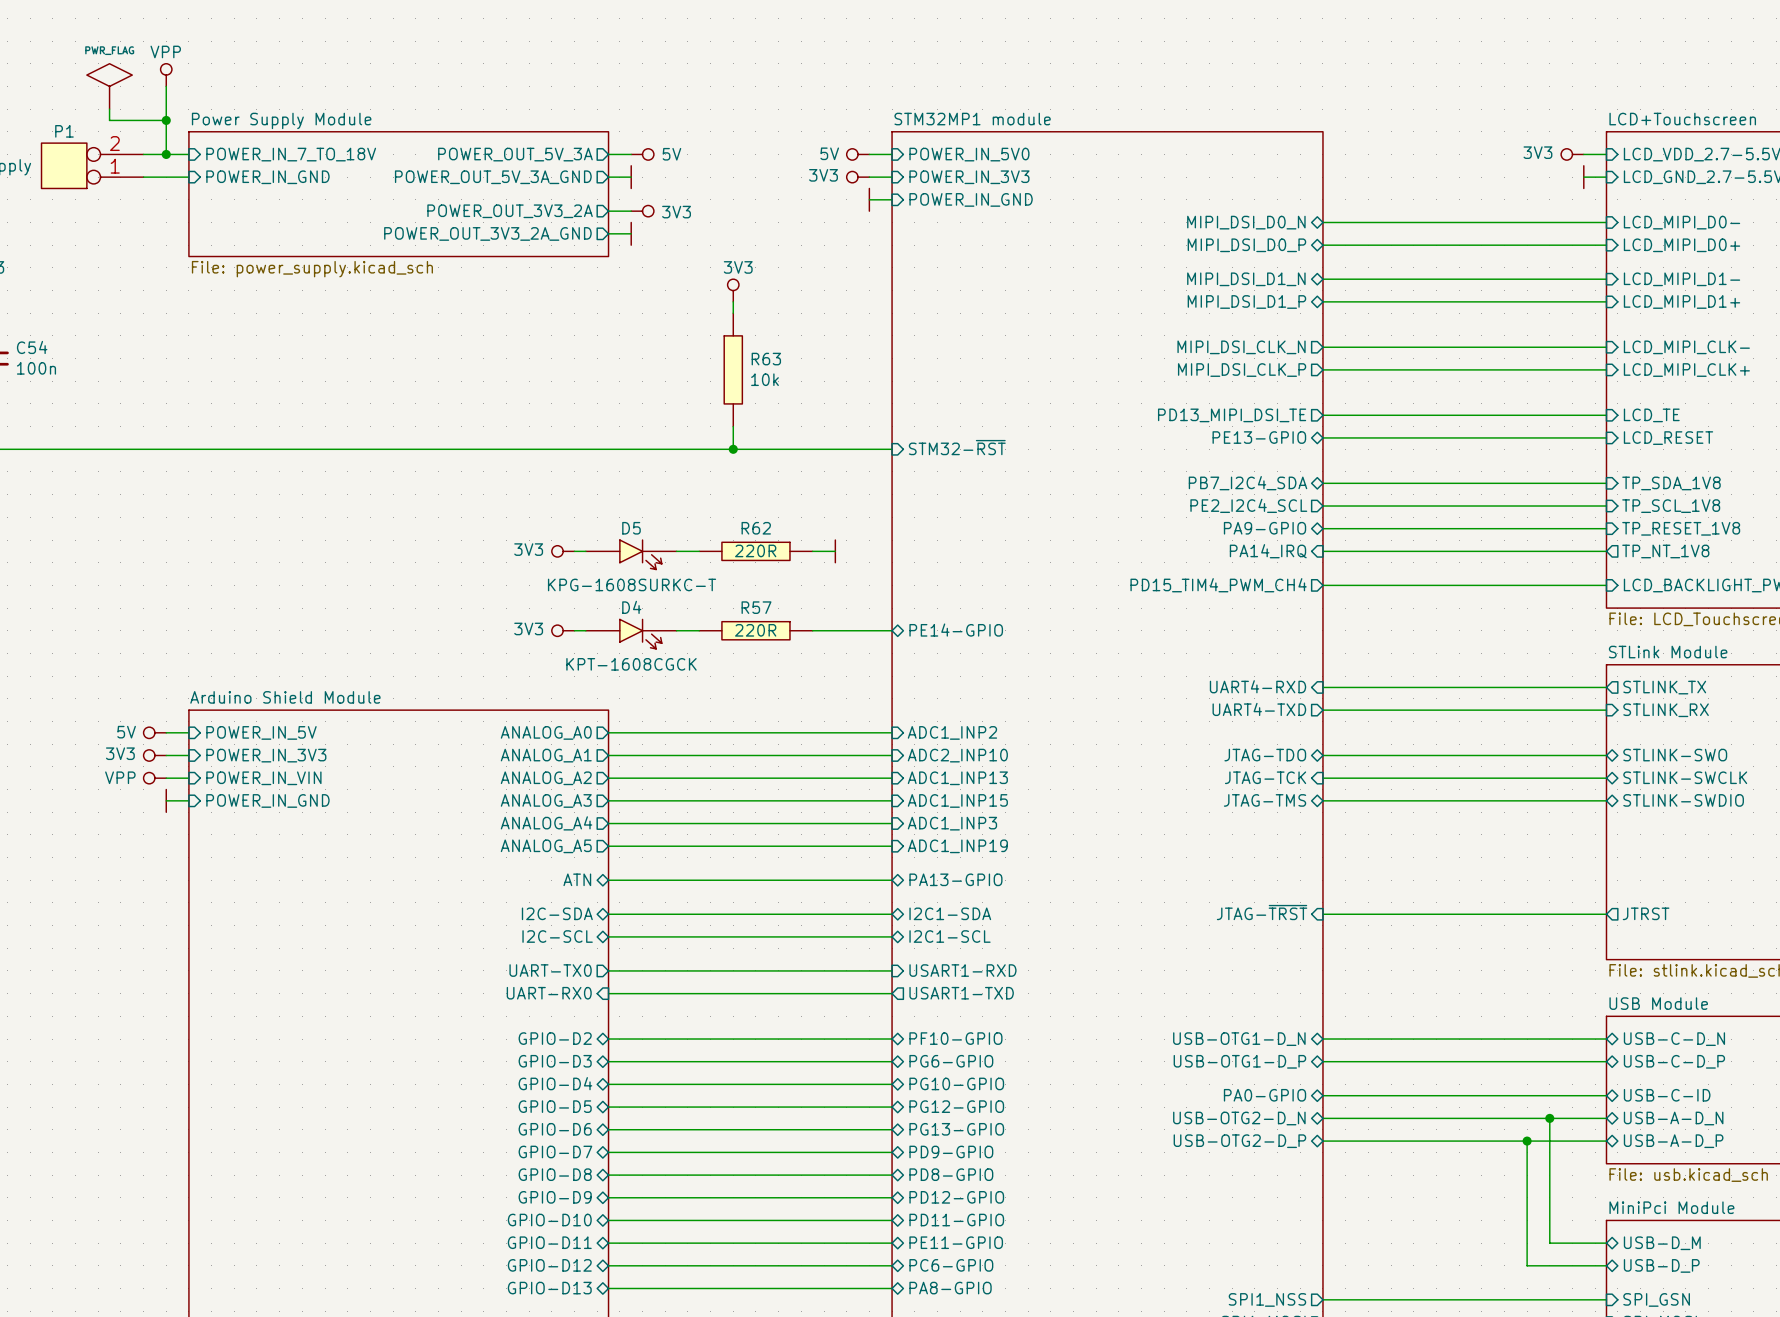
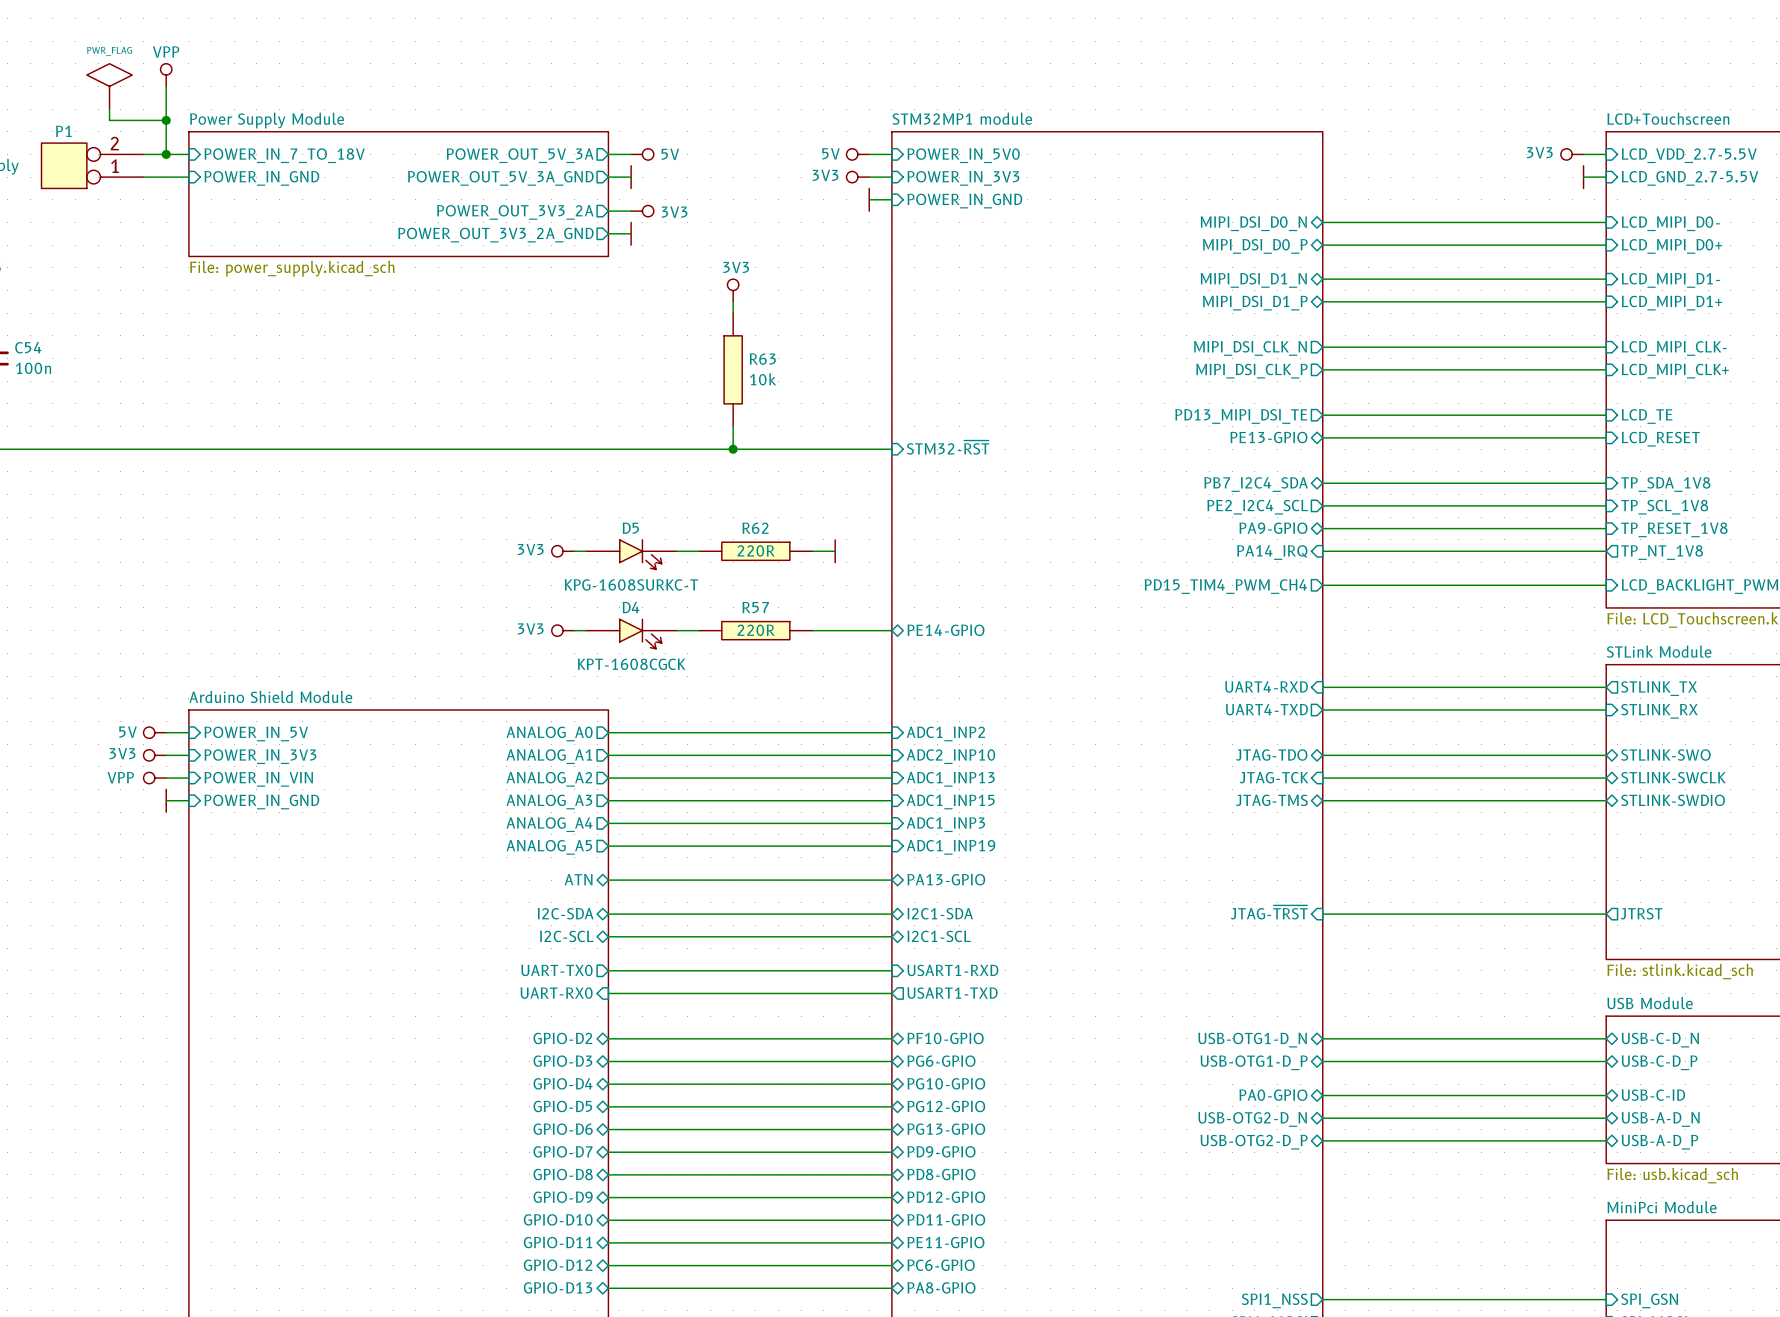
wire: (1549, 1118) (1549, 1243) (1606, 1243) -> none
junction: (1549, 1118) -> none
wire: (1527, 1141) (1527, 1265) (1606, 1265) -> none
junction: (1527, 1141) -> none
sheet pin: USB-D_M (1662, 1243) -> none
sheet pin: USB-D_P (1661, 1265) -> none

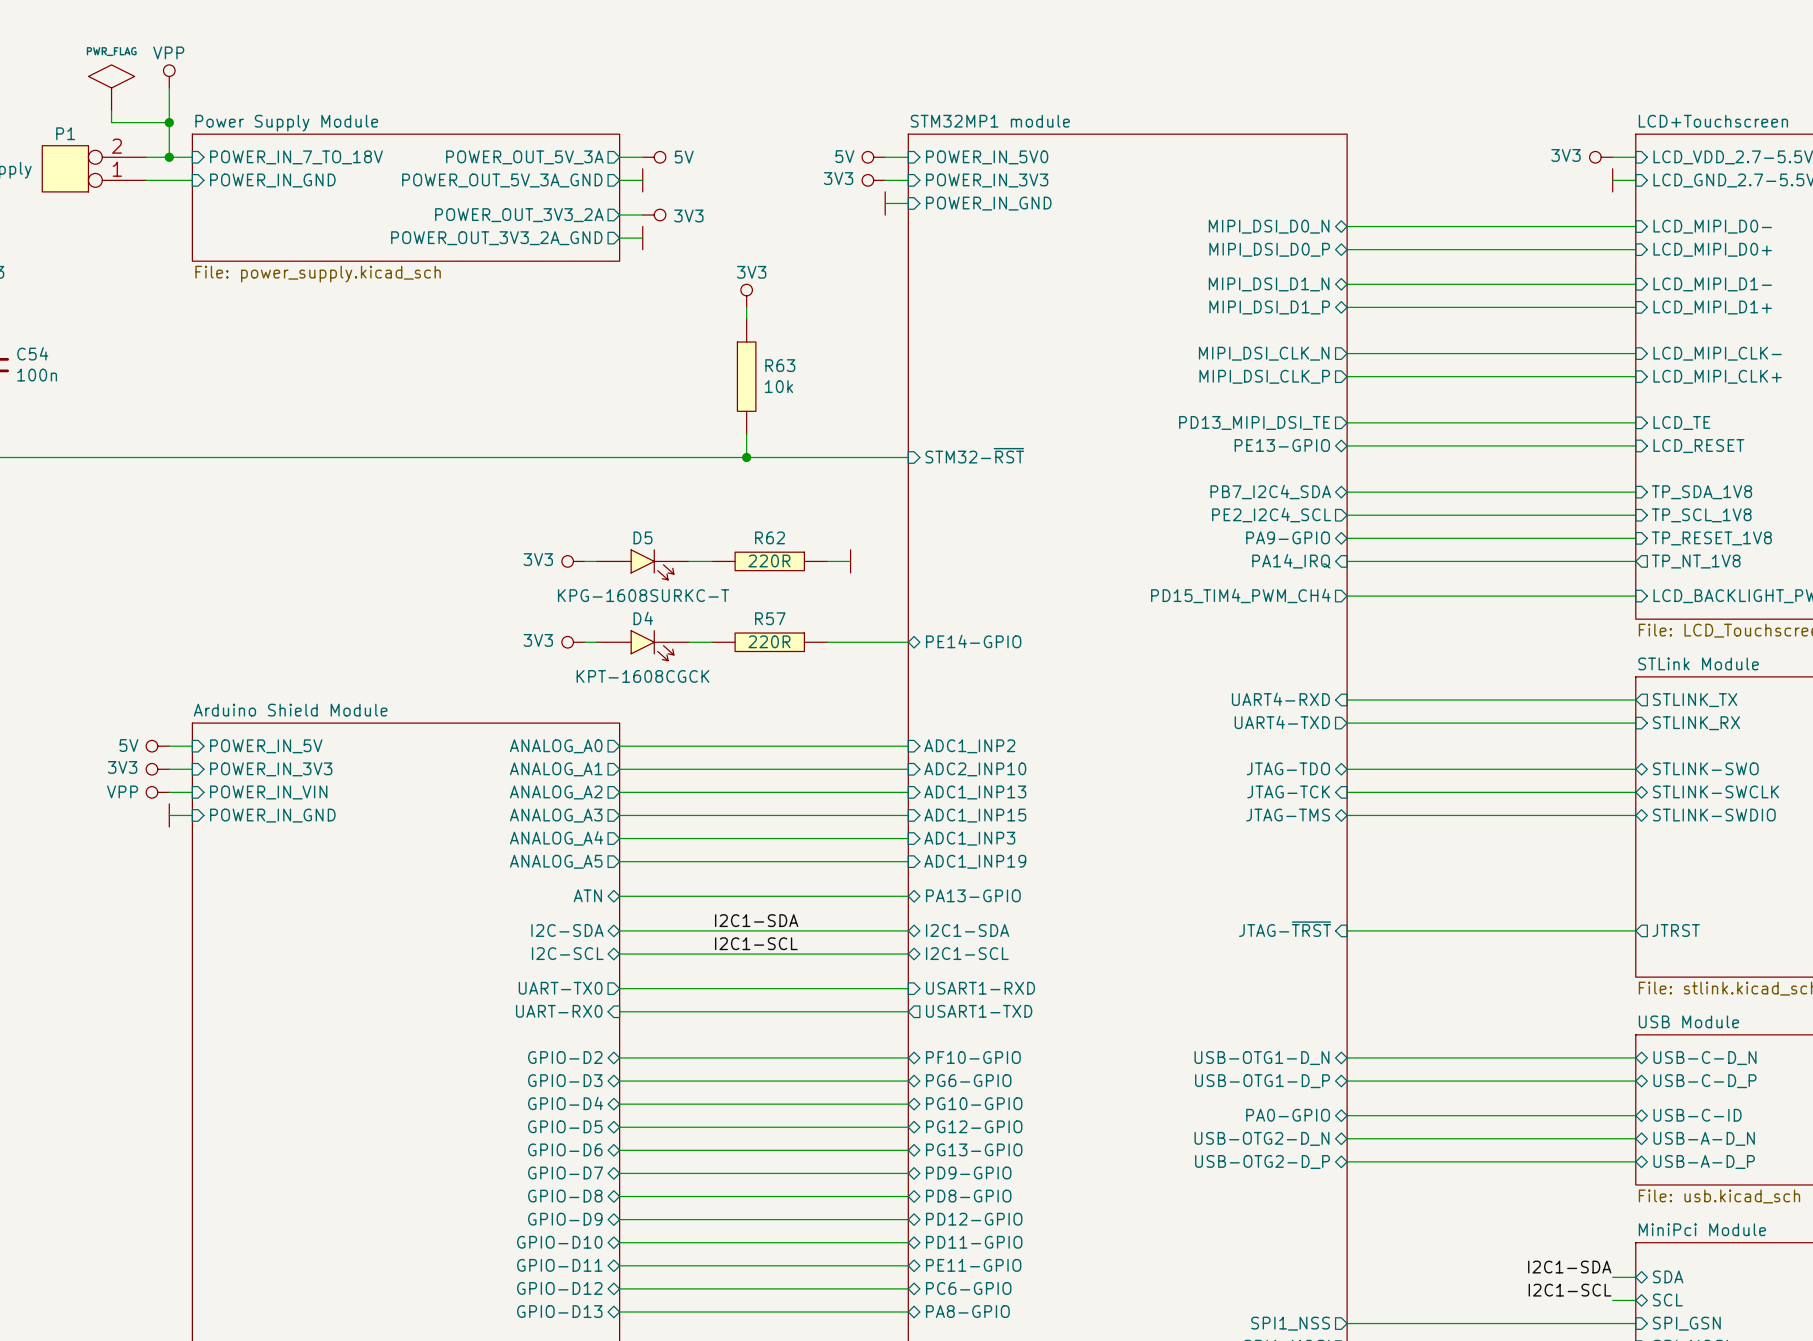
label: none -> I2C1-SDA (756, 920)
label: none -> I2C1-SCL (756, 943)
label: none -> I2C1-SDA (1569, 1267)
sheet pin: none -> SDA (1668, 1276)
wire: none -> (1612, 1277) (1635, 1277)
label: none -> I2C1-SCL (1569, 1290)
wire: none -> (1612, 1300) (1635, 1300)
sheet pin: none -> SCL (1667, 1300)

